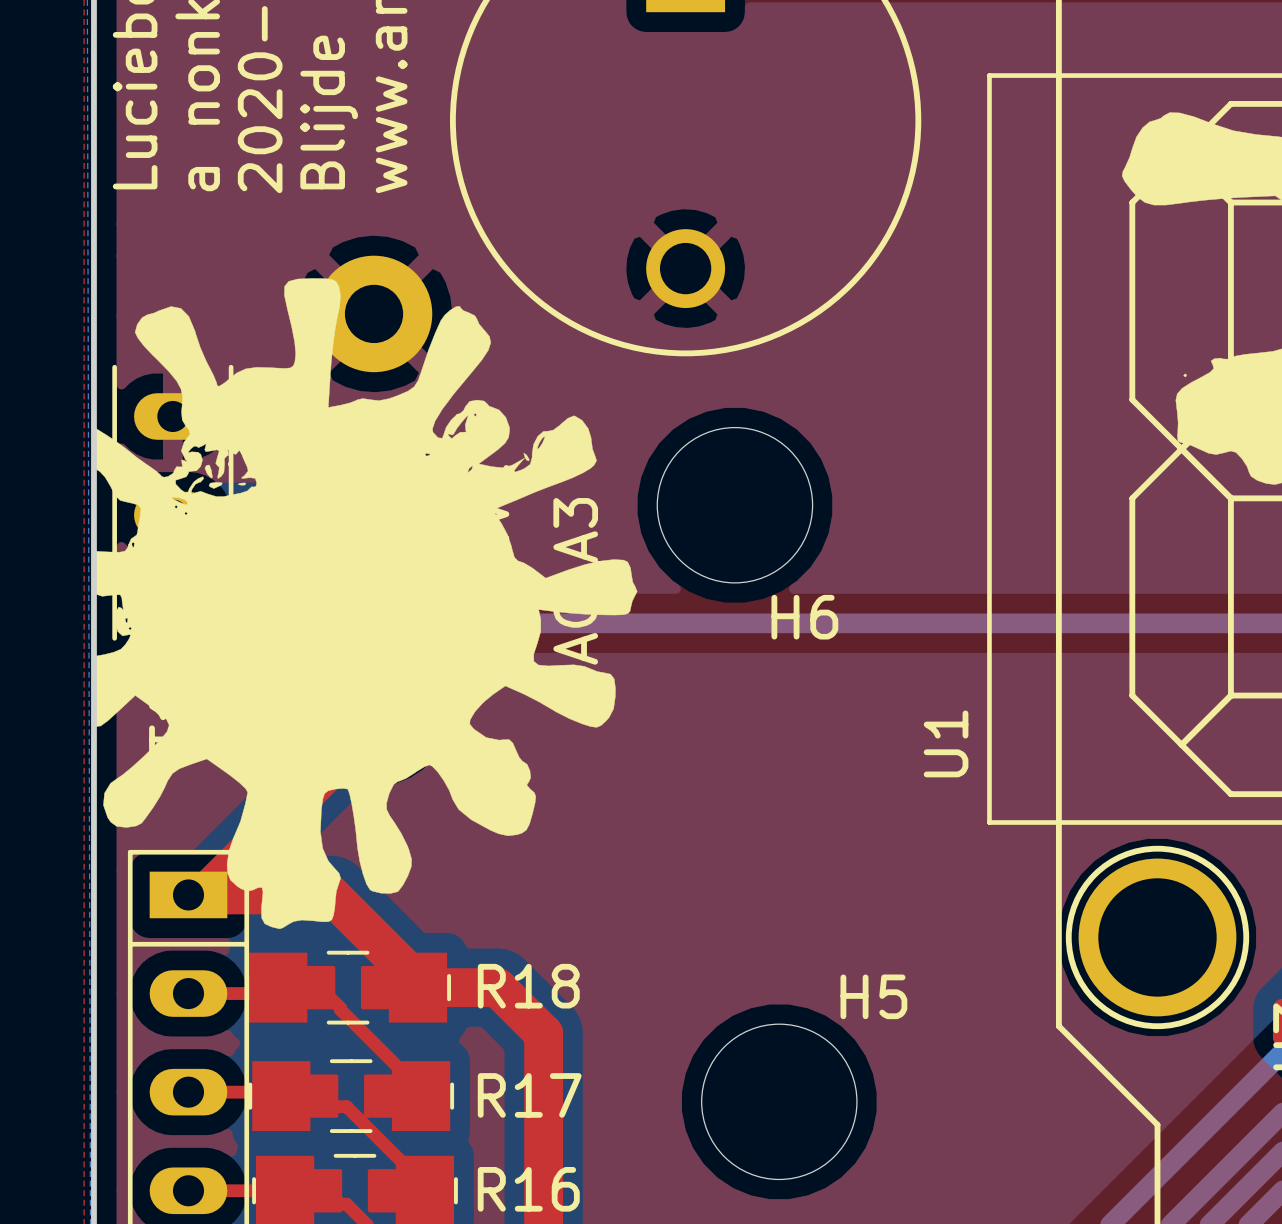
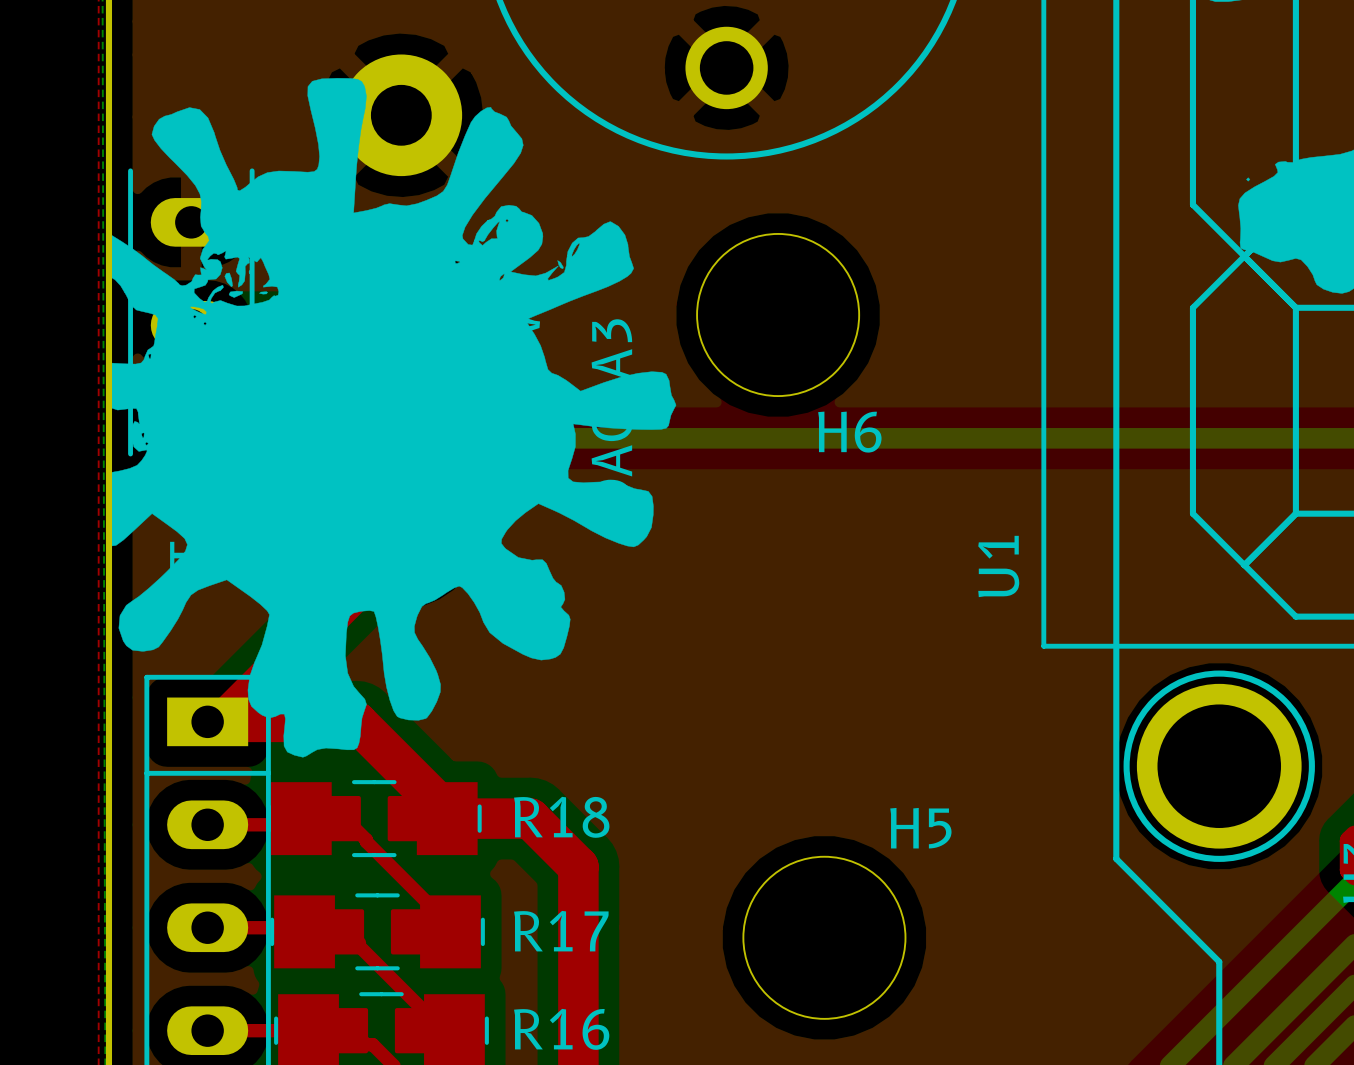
top track: none -> (356, 942) (437, 1024)
top track: (333, 1106) (346, 1106) (424, 1184) -> none

